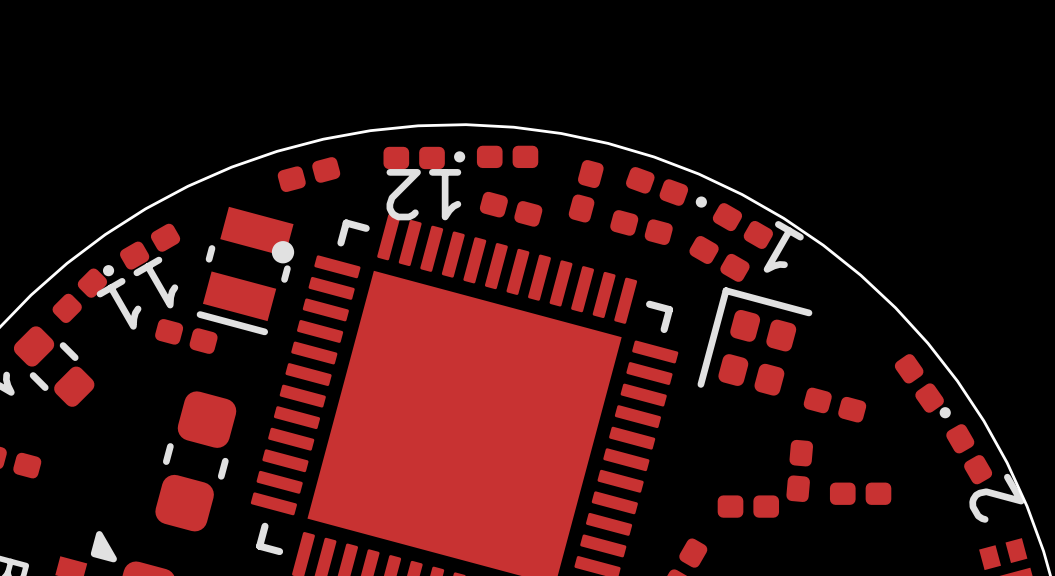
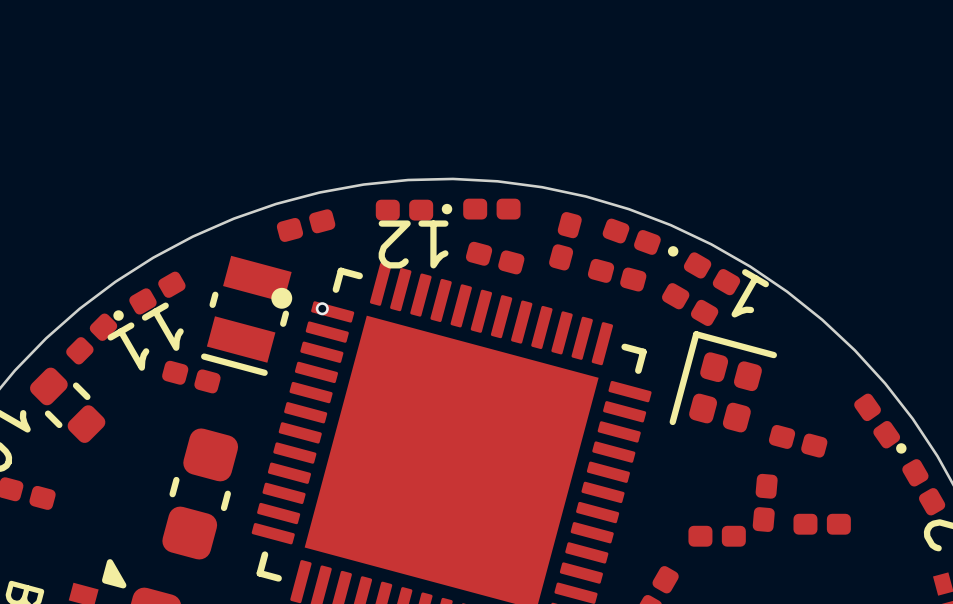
via: none -> (322, 308)

